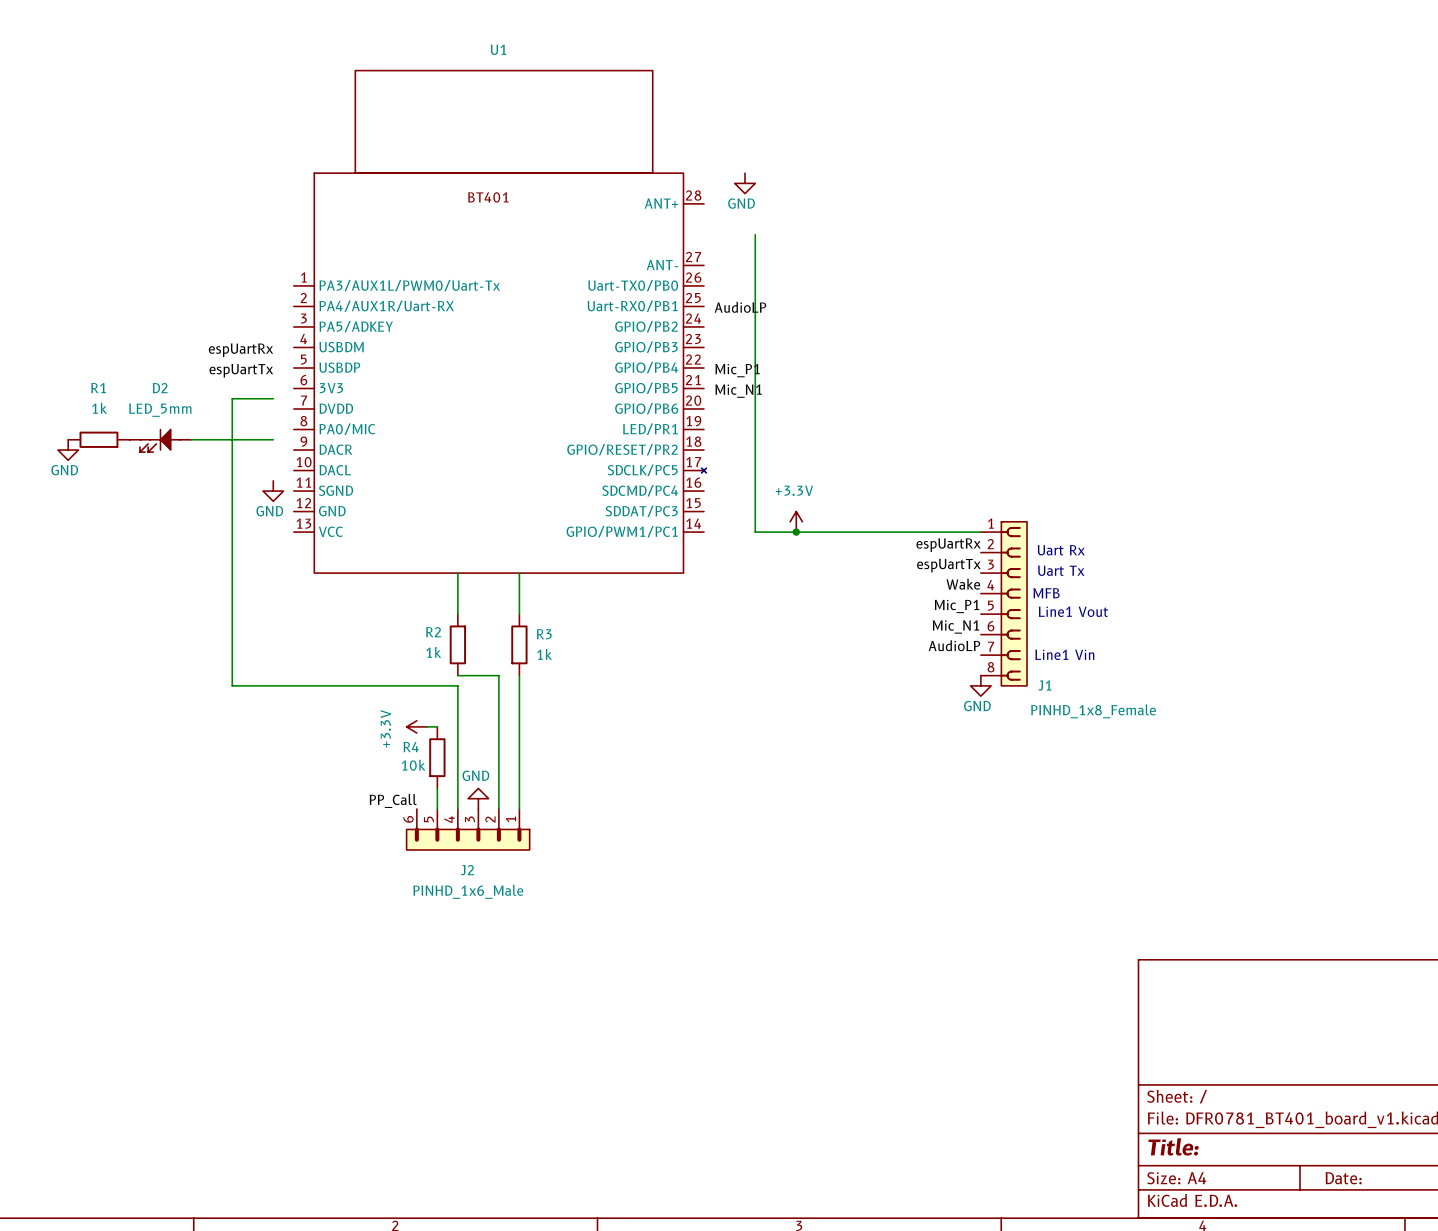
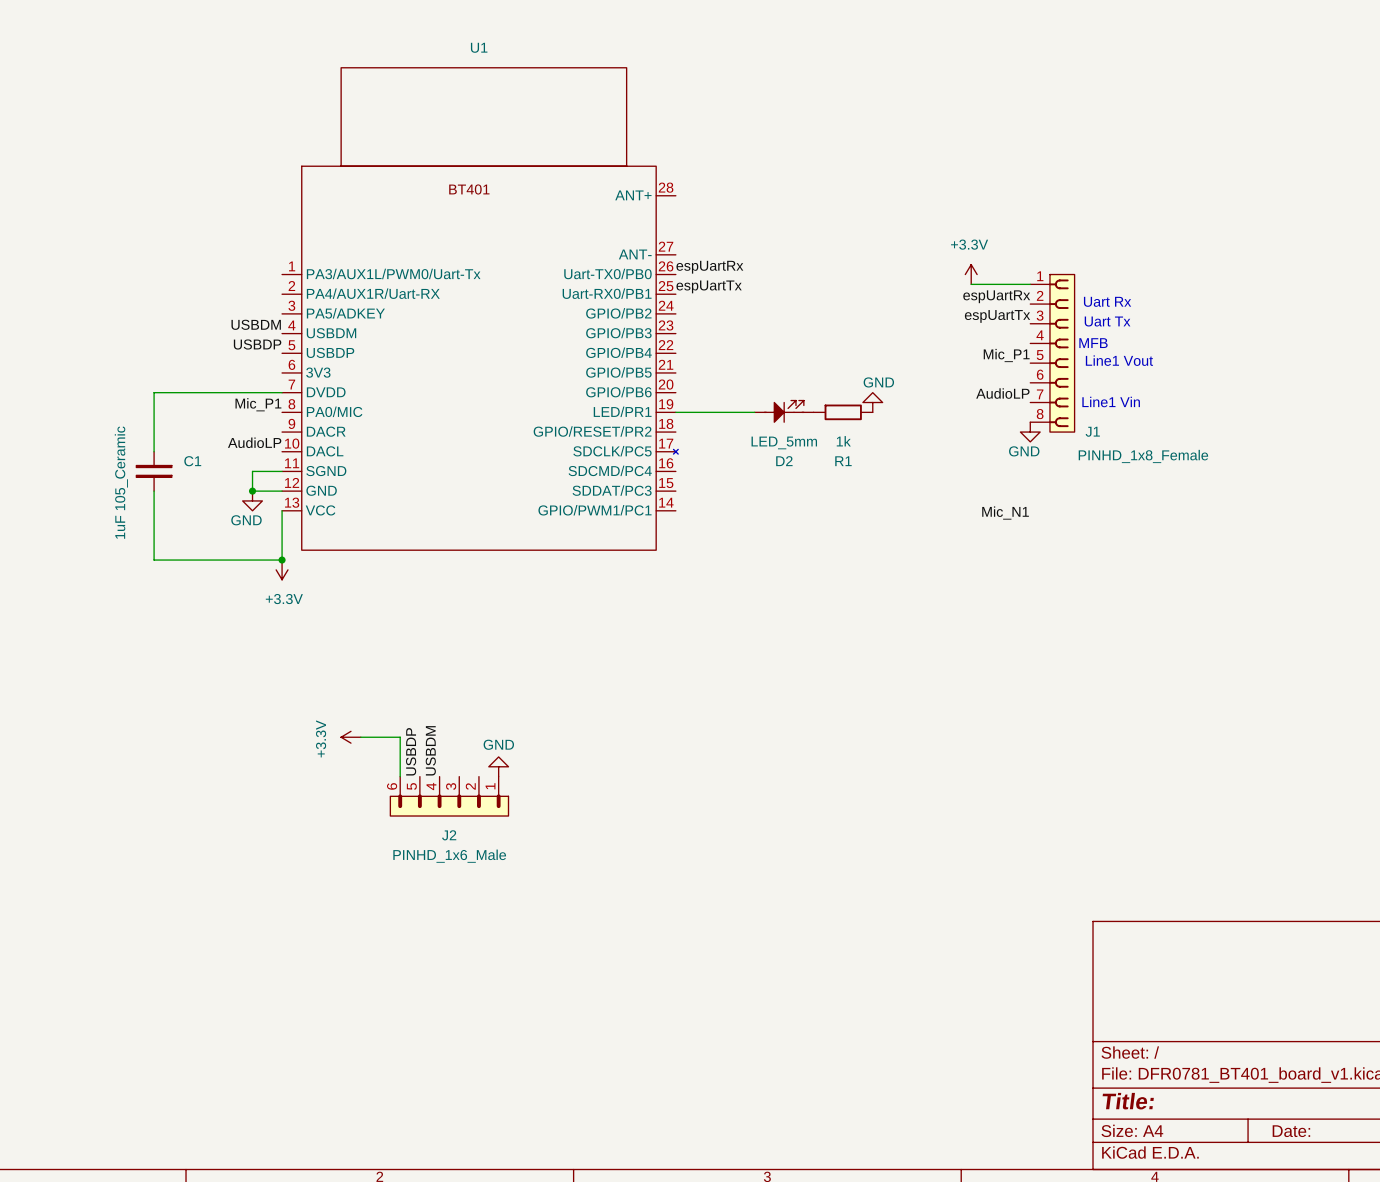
power symbol: GND (745, 183) -> none
wire: (755, 234) (755, 532) (980, 532) -> none
label: none -> espUartRx (709, 267)
power symbol: none -> +3.3V (971, 274)
wire: none -> (971, 284) (1030, 284)
label: none -> espUartTx (709, 286)
label: AudioLP (740, 307) -> none
label: none -> espUartRx (996, 296)
text: none -> Uart Rx (1107, 301)
label: none -> espUartTx (997, 316)
text: none -> Uart Tx (1107, 321)
label: none -> USBDM (256, 324)
label: espUartRx (240, 350) -> none
text: none -> MFB (1093, 343)
label: none -> USBDP (257, 344)
label: espUartTx (241, 370) -> none
label: Mic_P1 (737, 370) -> none
label: none -> Mic_P1 (1006, 355)
text: none -> Line1 Vout (1119, 360)
R1 name position: R1 (98, 388) -> R1 (843, 461)
label: Mic_N1 (738, 391) -> none
wire: (273, 398) (232, 398) (232, 685) (457, 685) (457, 808) -> none
R1 value position: 1k (99, 408) -> 1k (843, 441)
wire: none -> (282, 392) (154, 392) (154, 451)
label: none -> AudioLP (1002, 393)
text: none -> Line1 Vin (1111, 401)
power symbol: none -> GND (872, 402)
label: none -> Mic_P1 (258, 404)
wire: none -> (675, 412) (754, 412)
R1 position: (98, 439) -> (843, 412)
wire: (191, 439) (273, 439) -> none
D2 rotation: 0° (160, 440) -> 180° (784, 411)
D2 position: (160, 440) -> (784, 411)
power symbol: GND (68, 450) -> none
power symbol: none -> GND (1030, 432)
label: none -> AudioLP (254, 442)
C1: none -> 1uF 105_Ceramic (154, 471)
power symbol position: GND (273, 491) -> GND (252, 500)
wire: none -> (282, 471) (252, 471) (252, 491) (282, 491)
wire: none -> (154, 491) (154, 560) (282, 560) (282, 510)
junction: none -> (252, 491)
power symbol: +3.3V (796, 521) -> none
junction: (796, 532) -> none
label: espUartRx (948, 545) -> none
text: Uart Rx (1061, 550) -> none
label: espUartTx (948, 565) -> none
text: Uart Tx (1061, 570) -> none
wire: (457, 573) (457, 614) -> none
wire: (519, 573) (519, 614) -> none
junction: none -> (282, 560)
label: Wake (963, 584) -> none
power symbol: none -> +3.3V (282, 569)
text: MFB (1046, 593) -> none
J1 position: (1003, 603) -> (1052, 353)
label: Mic_P1 (957, 606) -> none
text: Line1 Vout (1073, 611) -> none
label position: Mic_N1 (955, 627) -> Mic_N1 (1005, 513)
R2: 1k (457, 644) -> none
R3: 1k (519, 644) -> none
label: AudioLP (954, 645) -> none
text: Line1 Vin (1064, 654) -> none
wire: (457, 675) (498, 675) (498, 808) -> none
wire: (519, 675) (519, 808) -> none
power symbol: GND (980, 685) -> none
power symbol position: +3.3V (416, 726) -> +3.3V (350, 737)
wire: (427, 726) (437, 726) -> none
R4: 10k (437, 757) -> none
wire: none -> (360, 737) (400, 737) (400, 776)
label: none -> USBDM (430, 750)
label: none -> USBDP (411, 751)
wire: (437, 788) (437, 808) -> none
power symbol position: GND (478, 798) -> GND (498, 766)
label: PP_Call (393, 801) -> none

